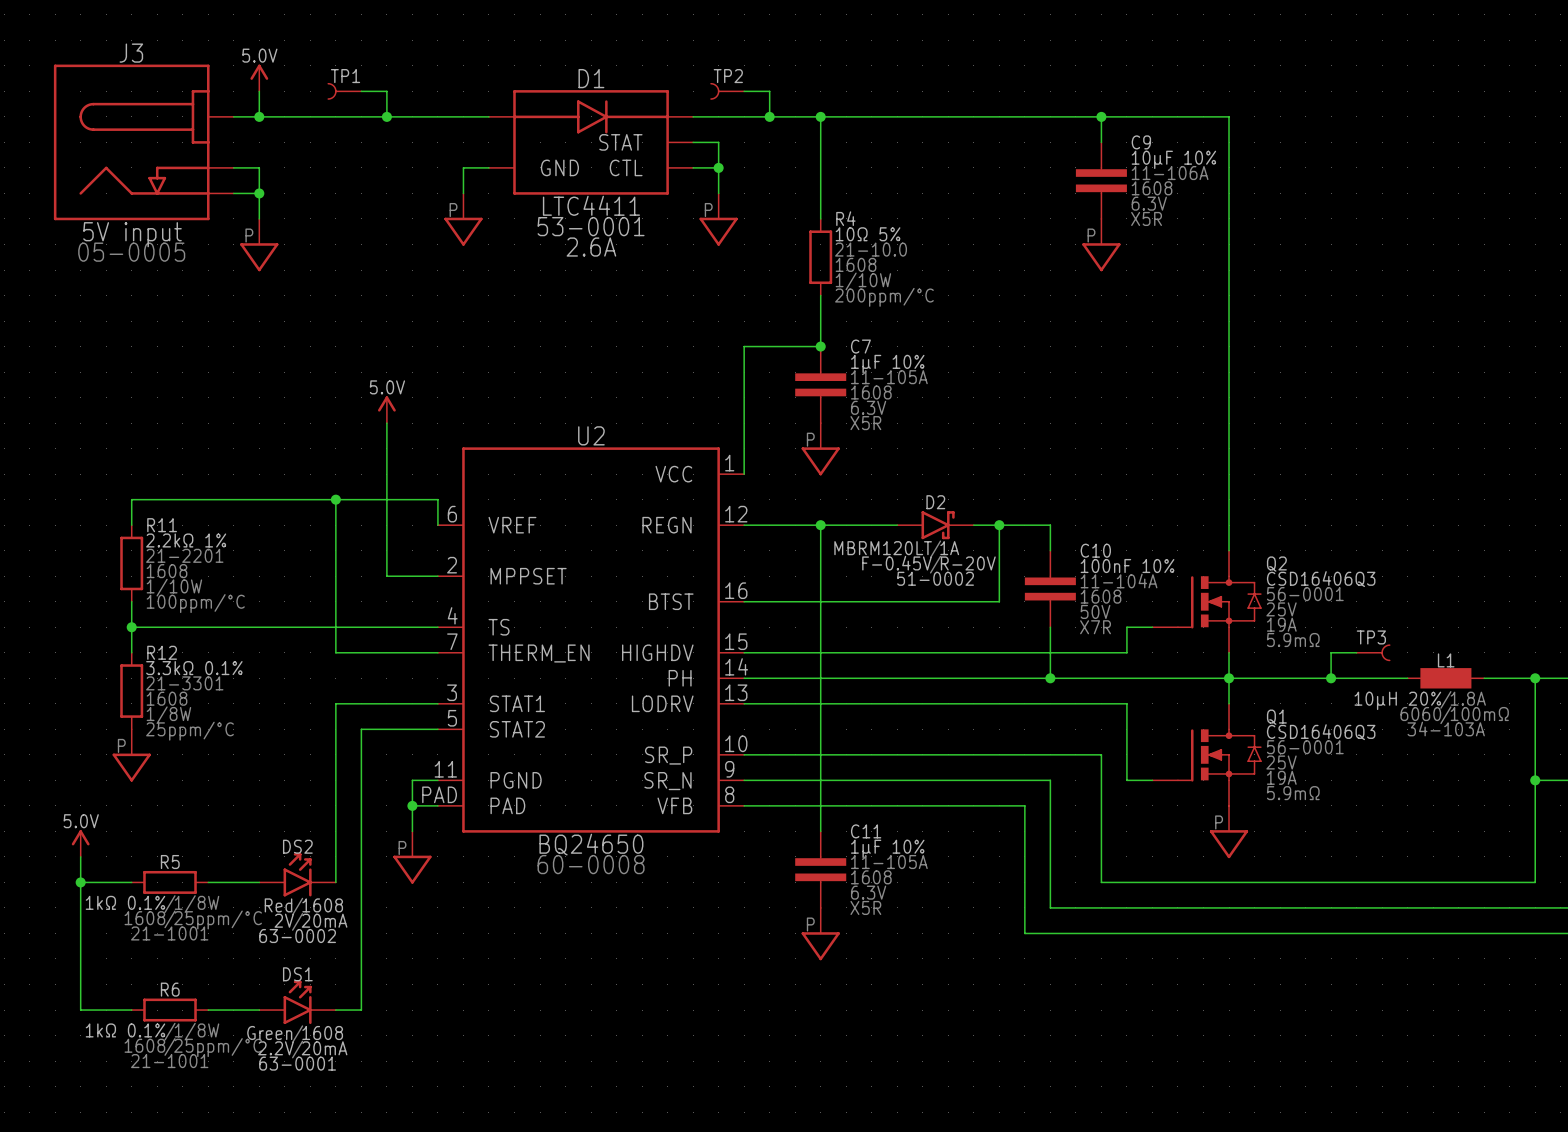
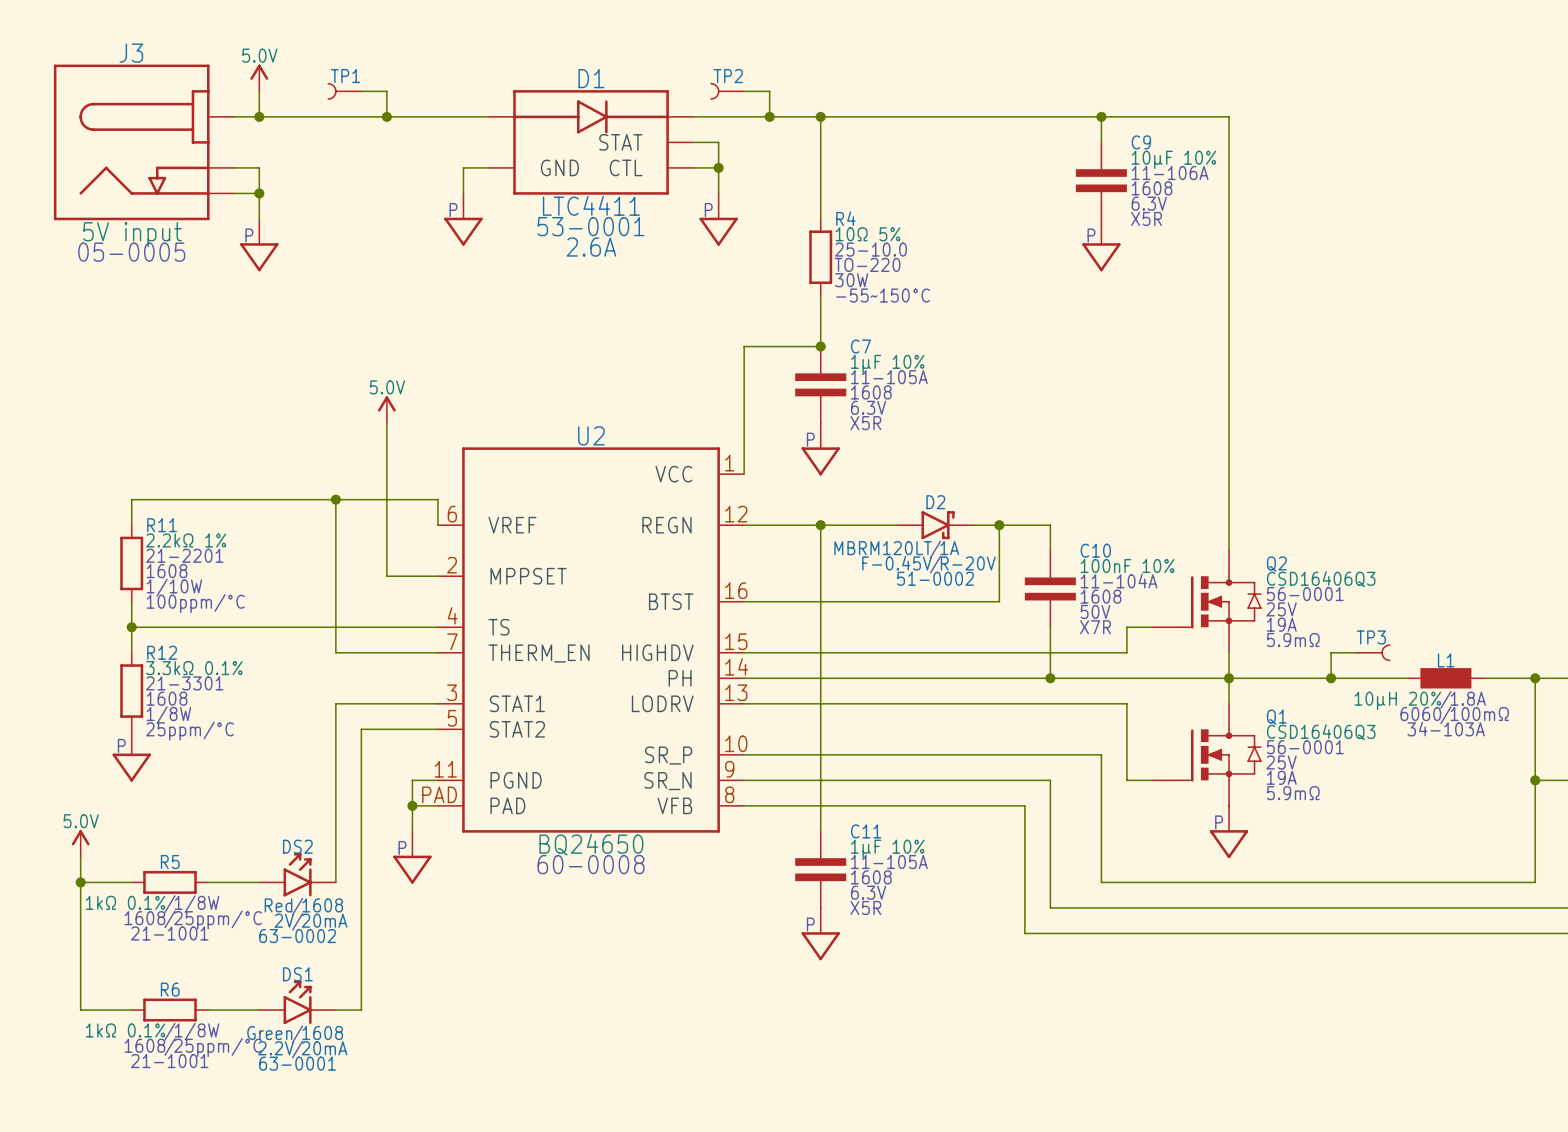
R4 text: 21-10.0 (871, 249) -> 25-10.0 (871, 249)
R4 text: 1608 (856, 264) -> TO-220 (867, 264)
R4 text: 1/10W (863, 281) -> 30W (851, 280)
R4 text: 200ppm/°C (884, 297) -> -55~150°C (883, 295)

